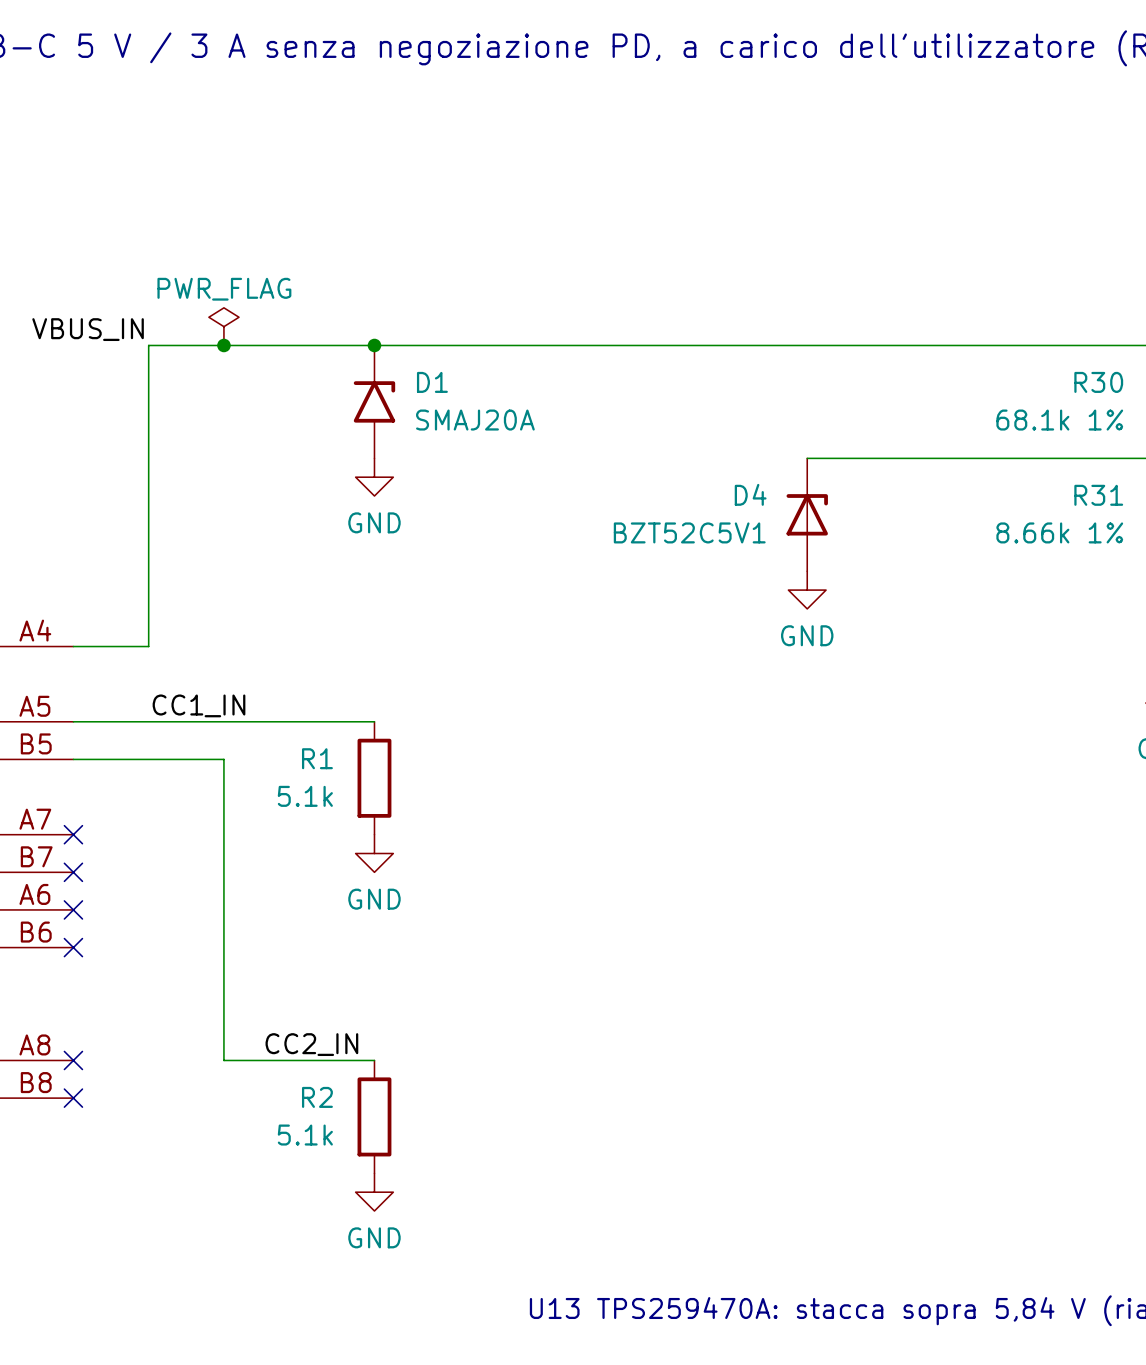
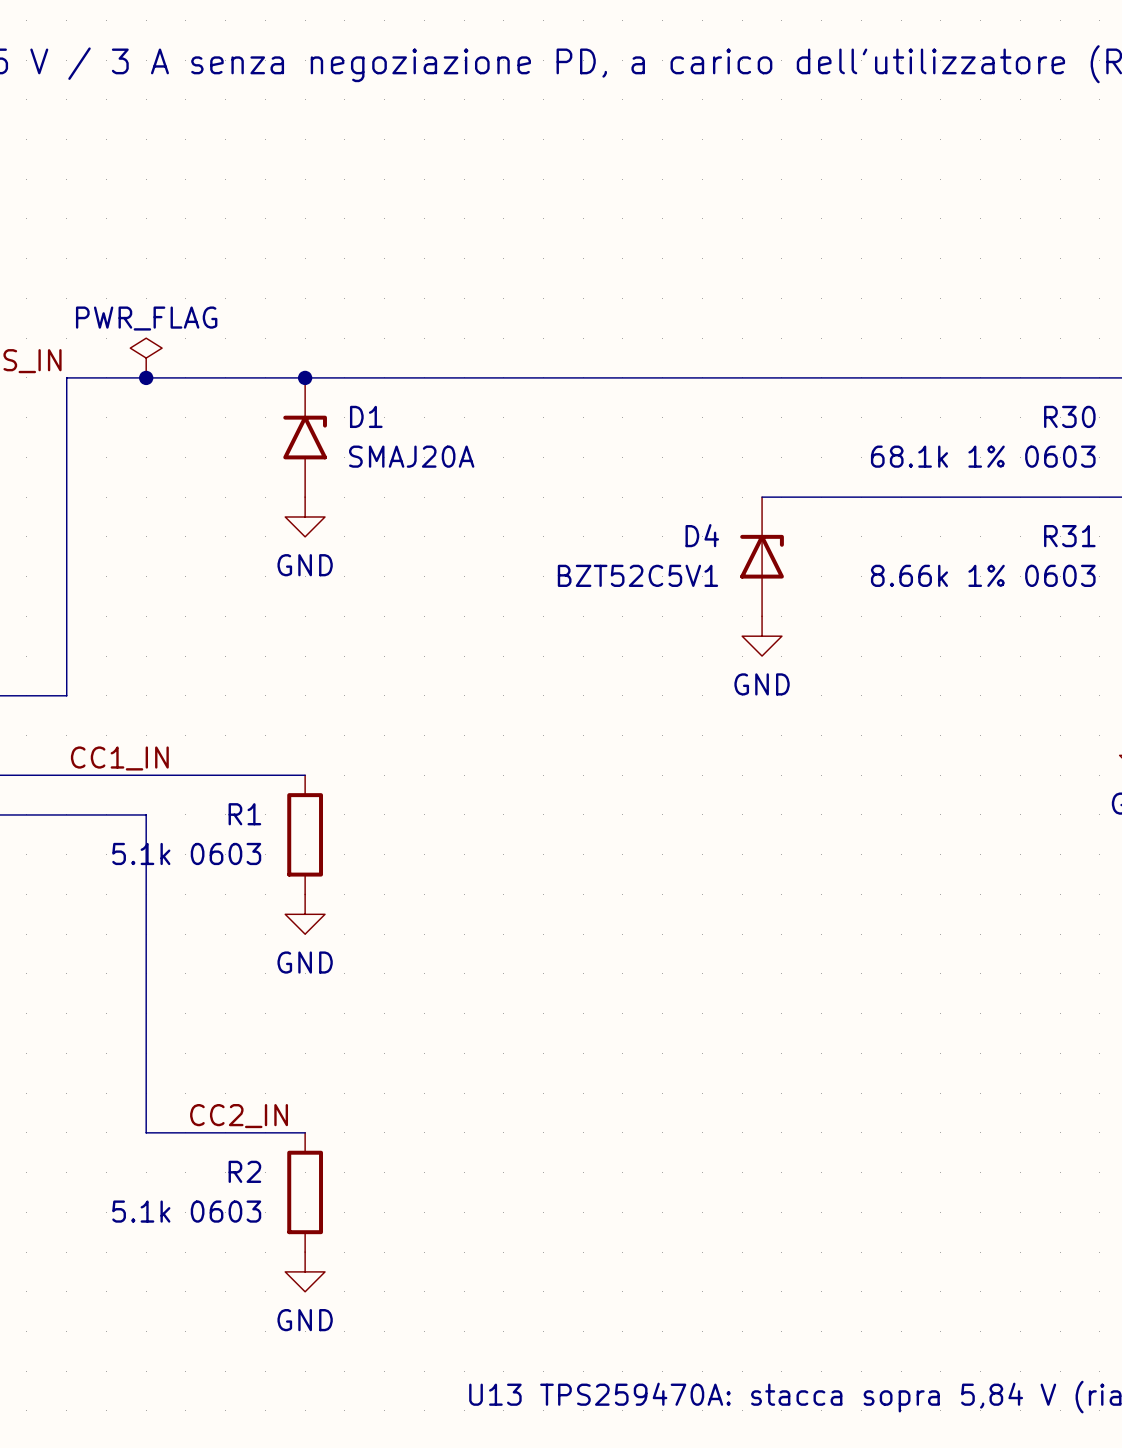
R30 value: 68.1k 1% (1059, 420) -> 68.1k 1% 0603 (983, 456)
R31 value: 8.66k 1% (1059, 532) -> 8.66k 1% 0603 (983, 575)
R1 value: 5.1k (305, 796) -> 5.1k 0603 (186, 853)
R2 value: 5.1k (305, 1135) -> 5.1k 0603 (186, 1211)

